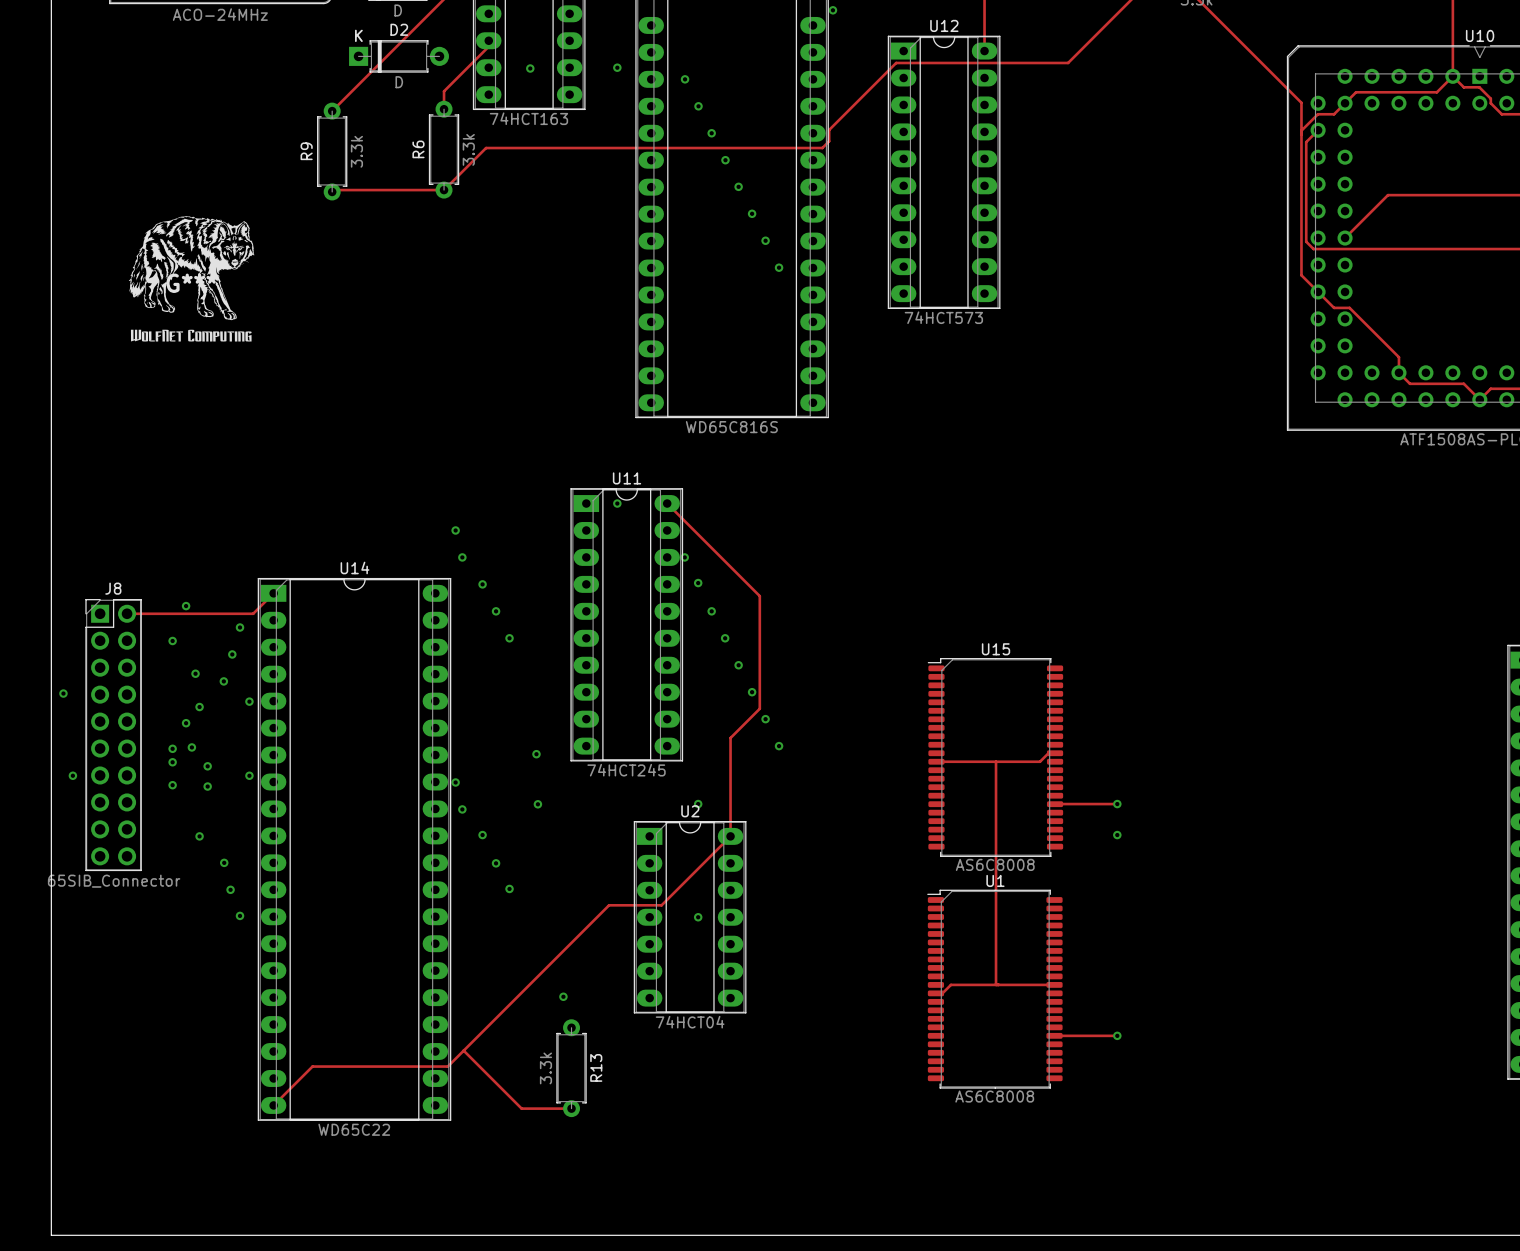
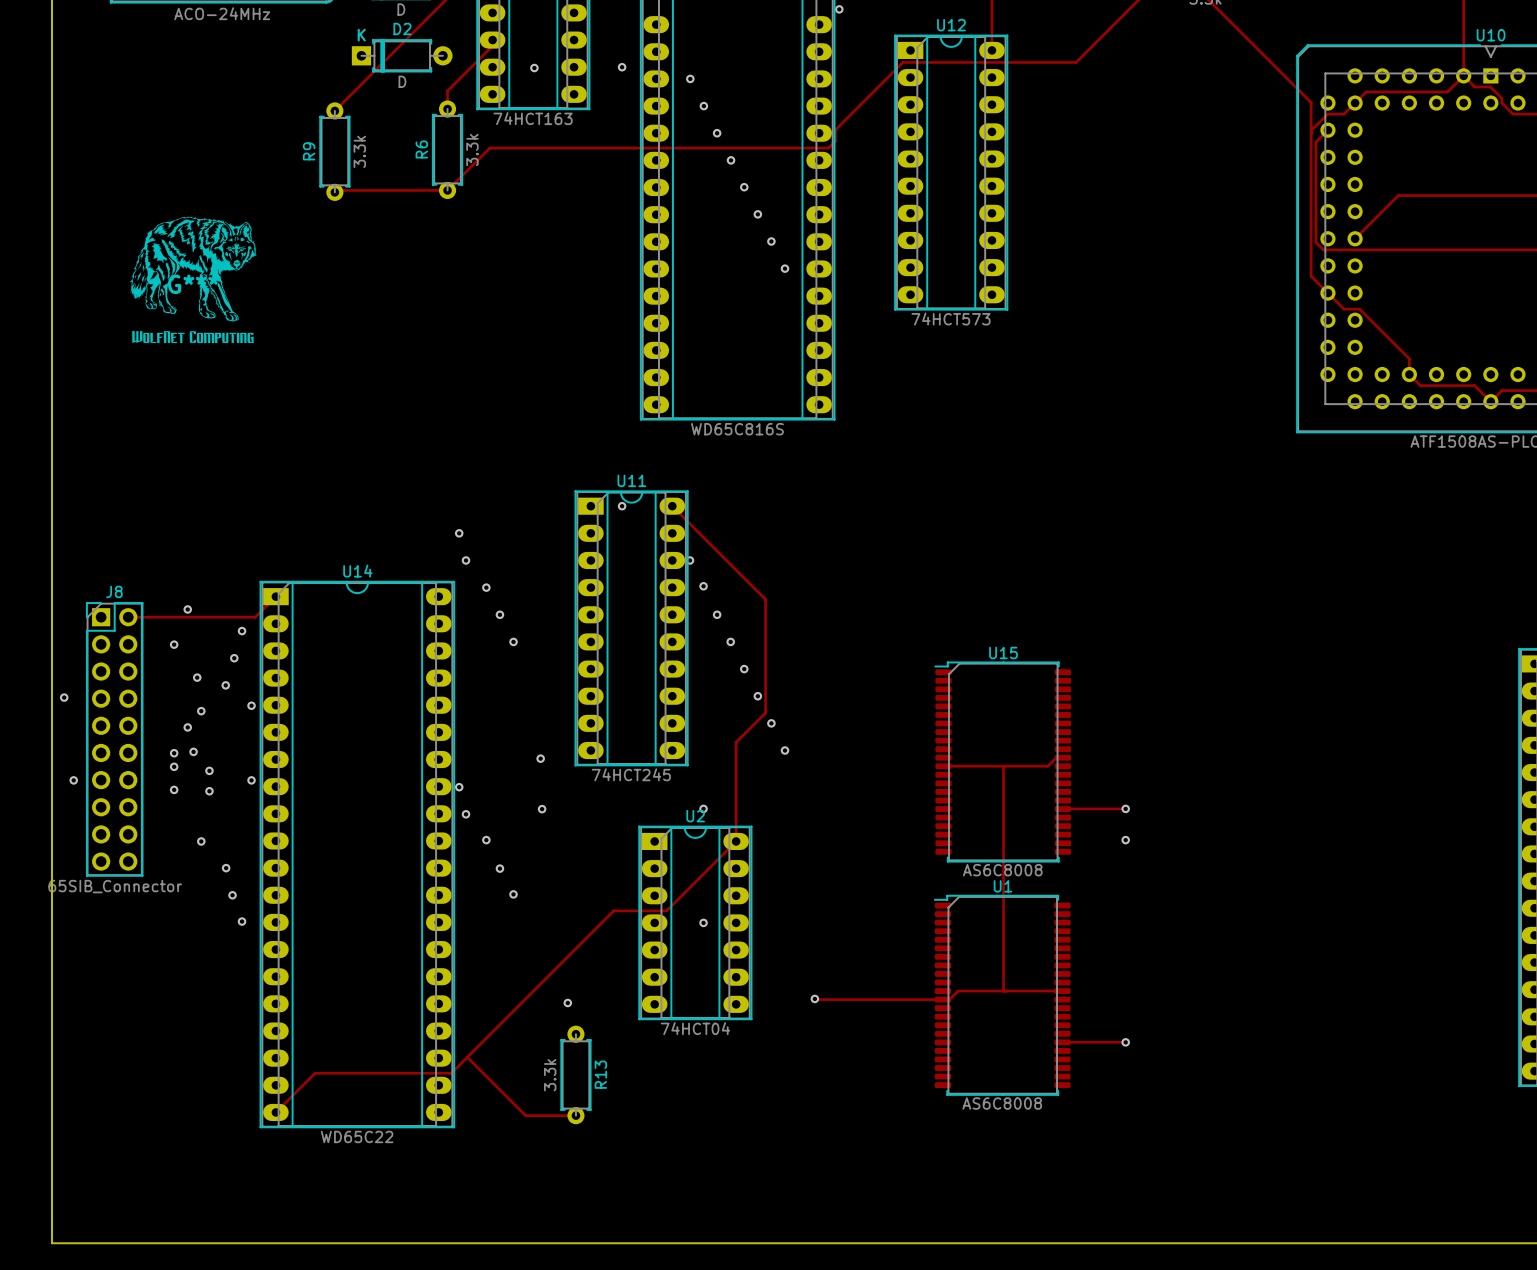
track: none -> (814, 998) (943, 999)
via: none -> (814, 998)

